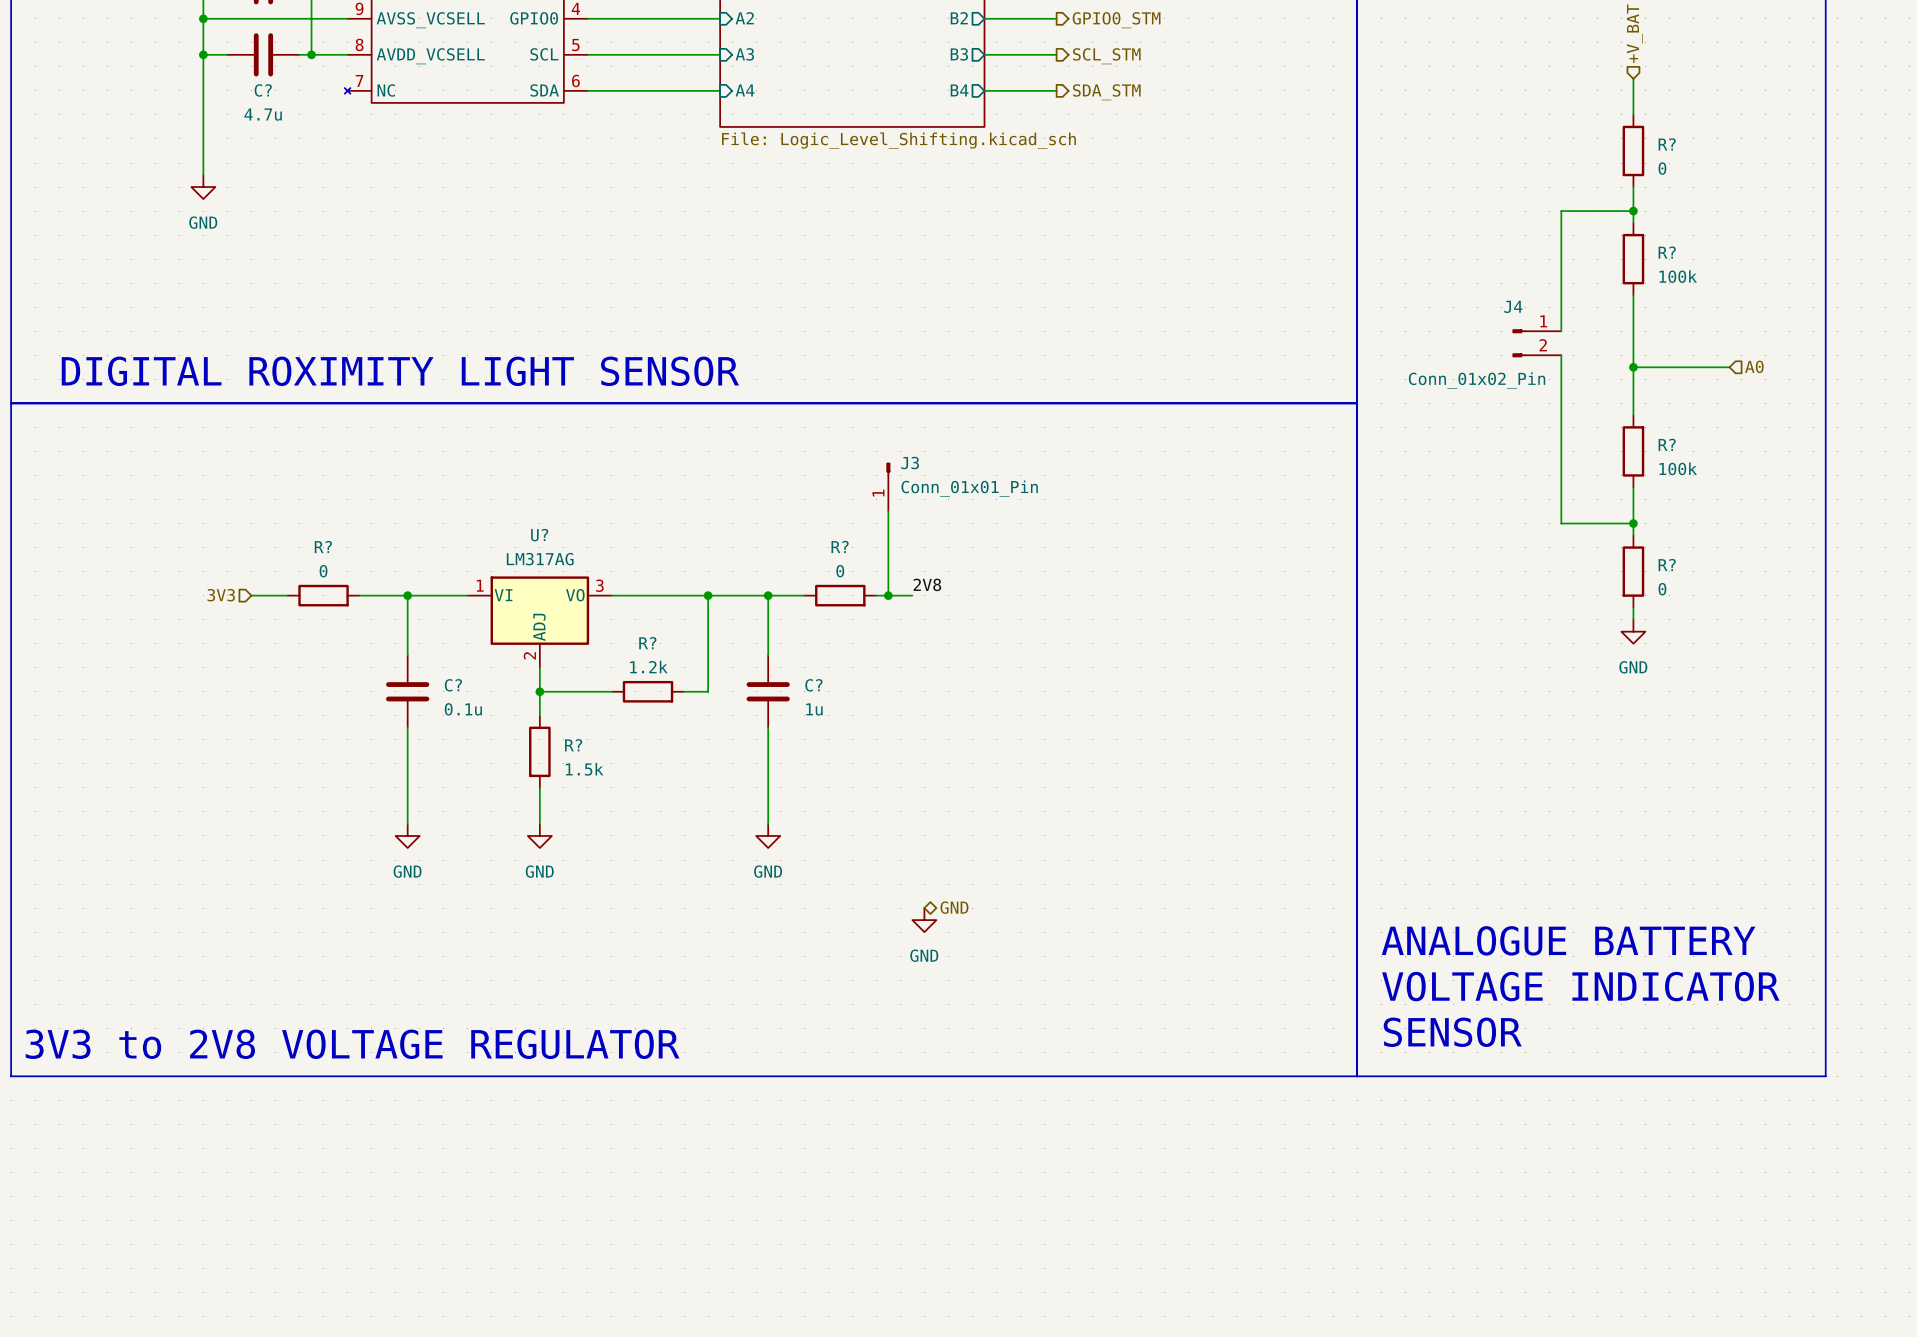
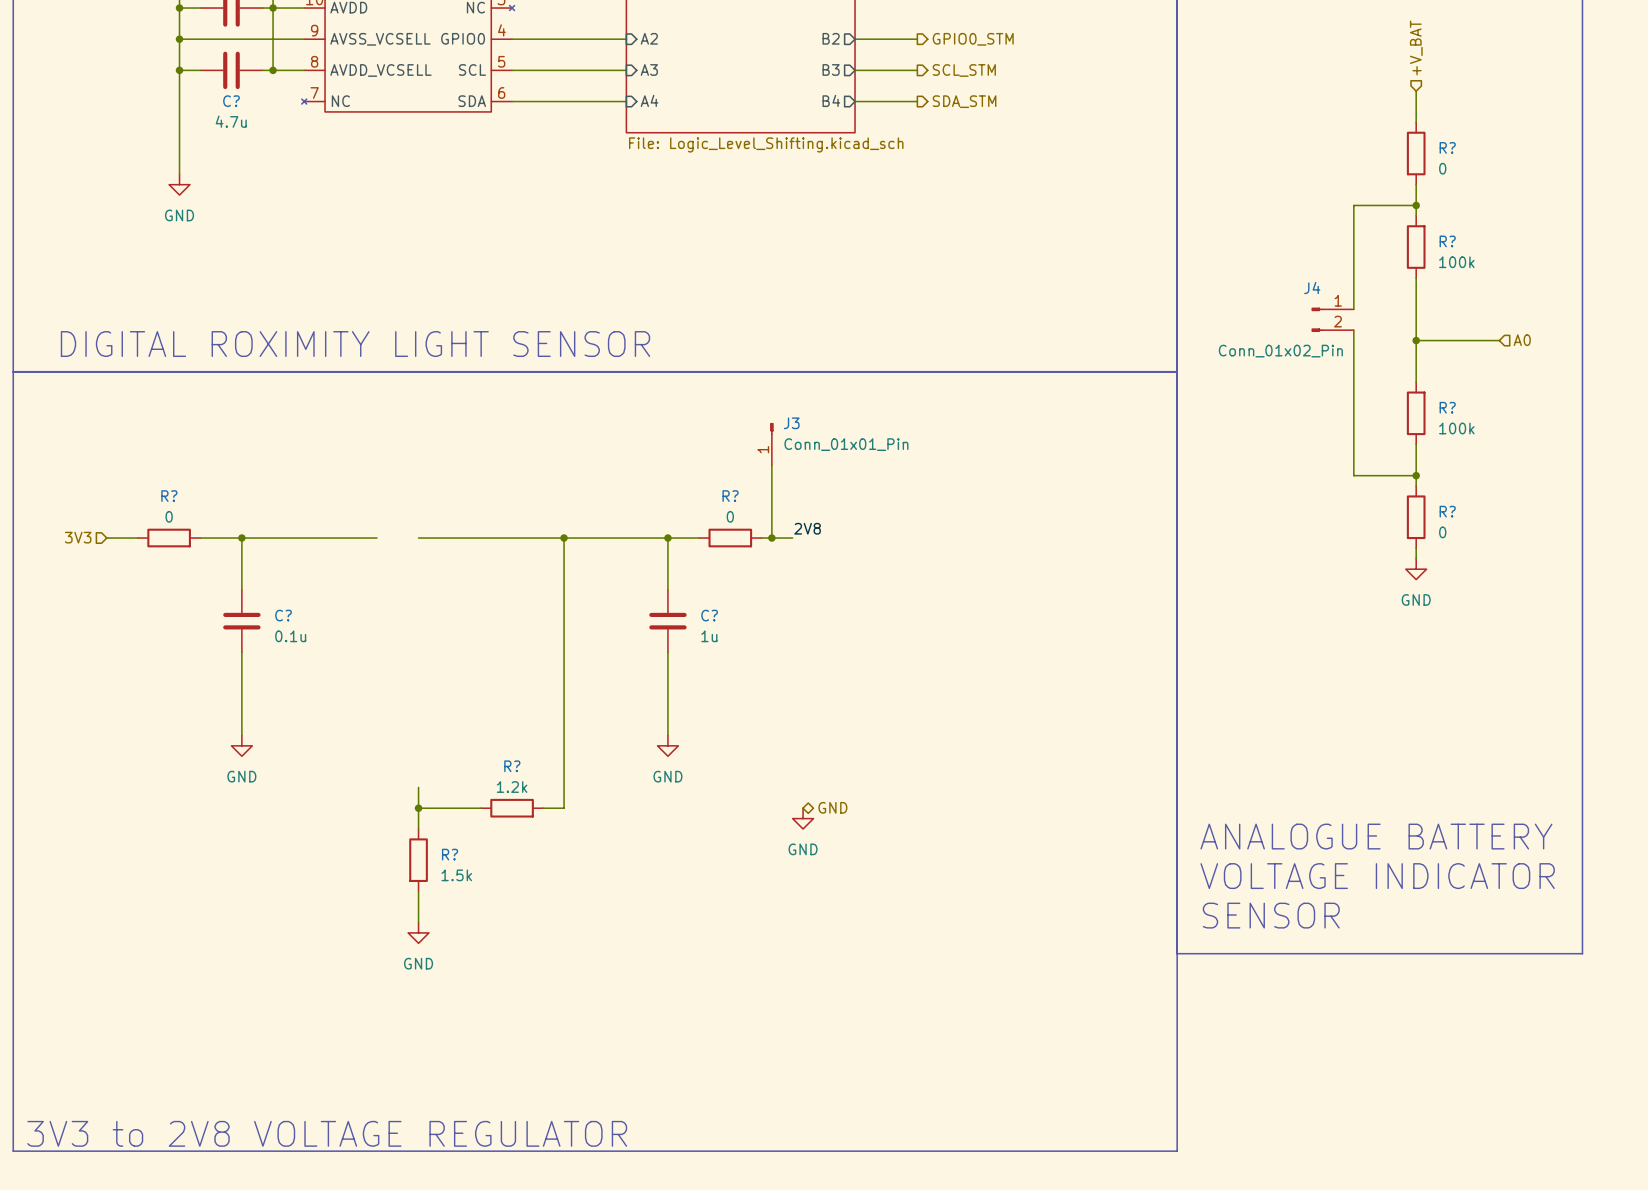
wire: none -> (106, 538) (137, 538)
hierarchical label position: 3V3 (221, 595) -> 3V3 (78, 537)
wire: none -> (200, 538) (221, 538)
junction: none -> (241, 538)
wire: none -> (252, 538) (314, 538)
R? position: (323, 595) -> (169, 538)
wire: (407, 595) (407, 655) -> (241, 538) (241, 589)
junction: (407, 595) -> none
wire: (431, 595) (467, 595) -> none
wire: none -> (564, 538) (564, 808) (543, 808)
junction: none -> (564, 538)
wire: (708, 595) (708, 691) (684, 691) -> none
junction: (708, 595) -> none
U?: LM317AG (539, 622) -> none
wire: (539, 667) (539, 715) -> (418, 787) (418, 829)
C? position: (407, 691) -> (241, 621)
wire: (539, 691) (611, 691) -> (418, 808) (480, 808)
junction: (539, 691) -> none
R? position: (648, 691) -> (512, 808)
wire: (407, 727) (407, 823) -> (241, 652) (241, 735)
R? position: (539, 751) -> (418, 860)
wire: (539, 787) (539, 823) -> (418, 891) (418, 922)
power symbol: none -> GND (241, 745)
power symbol: GND (407, 835) -> none
power symbol: GND (539, 835) -> none
junction: none -> (418, 808)
text: 3V3 to 2V8 VOLTAGE REGULATOR (352, 1044) -> none
power symbol: none -> GND (418, 932)
line: (11, 1076) (1357, 1076) -> (13, 953) (13, 1151) (1177, 1151) (1177, 953)
text: none -> 3V3 to 2V8 VOLTAGE REGULATOR (327, 1133)

